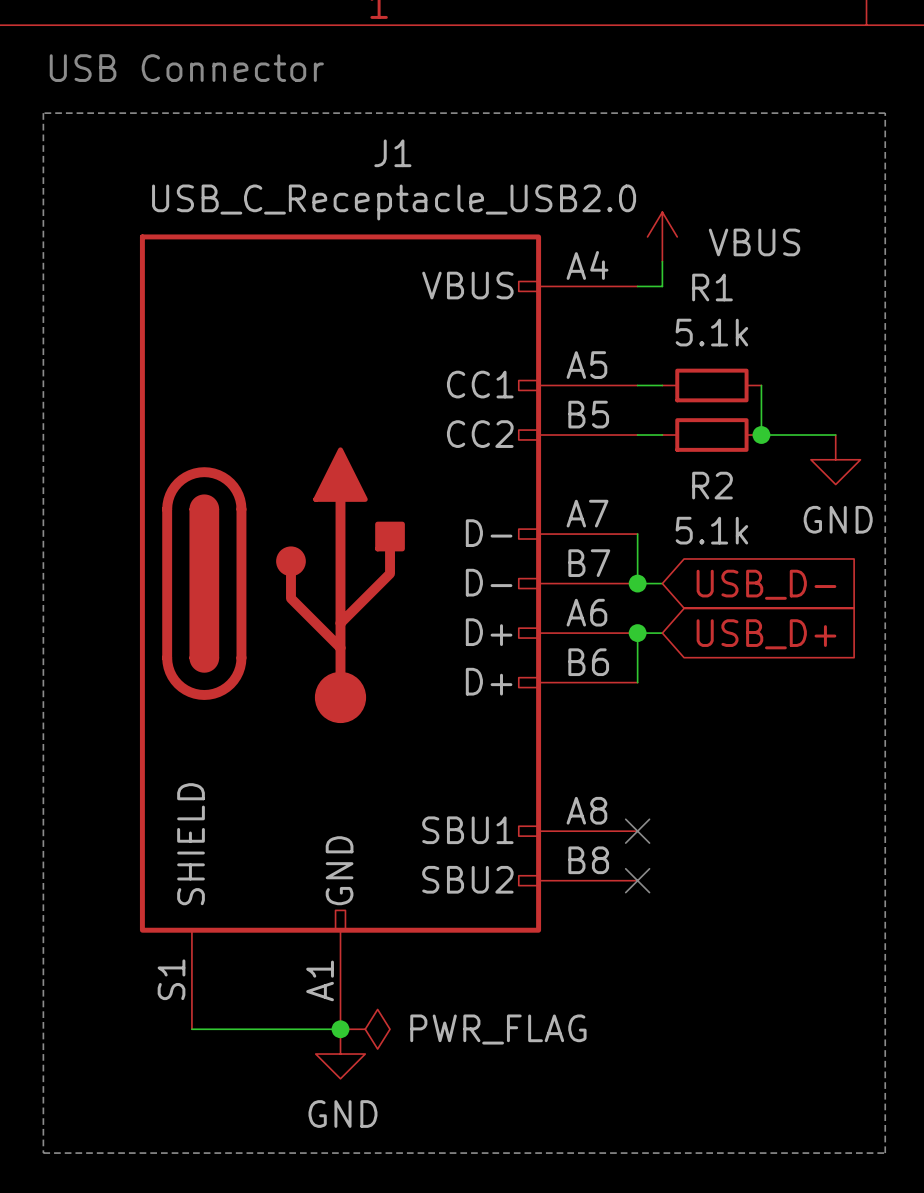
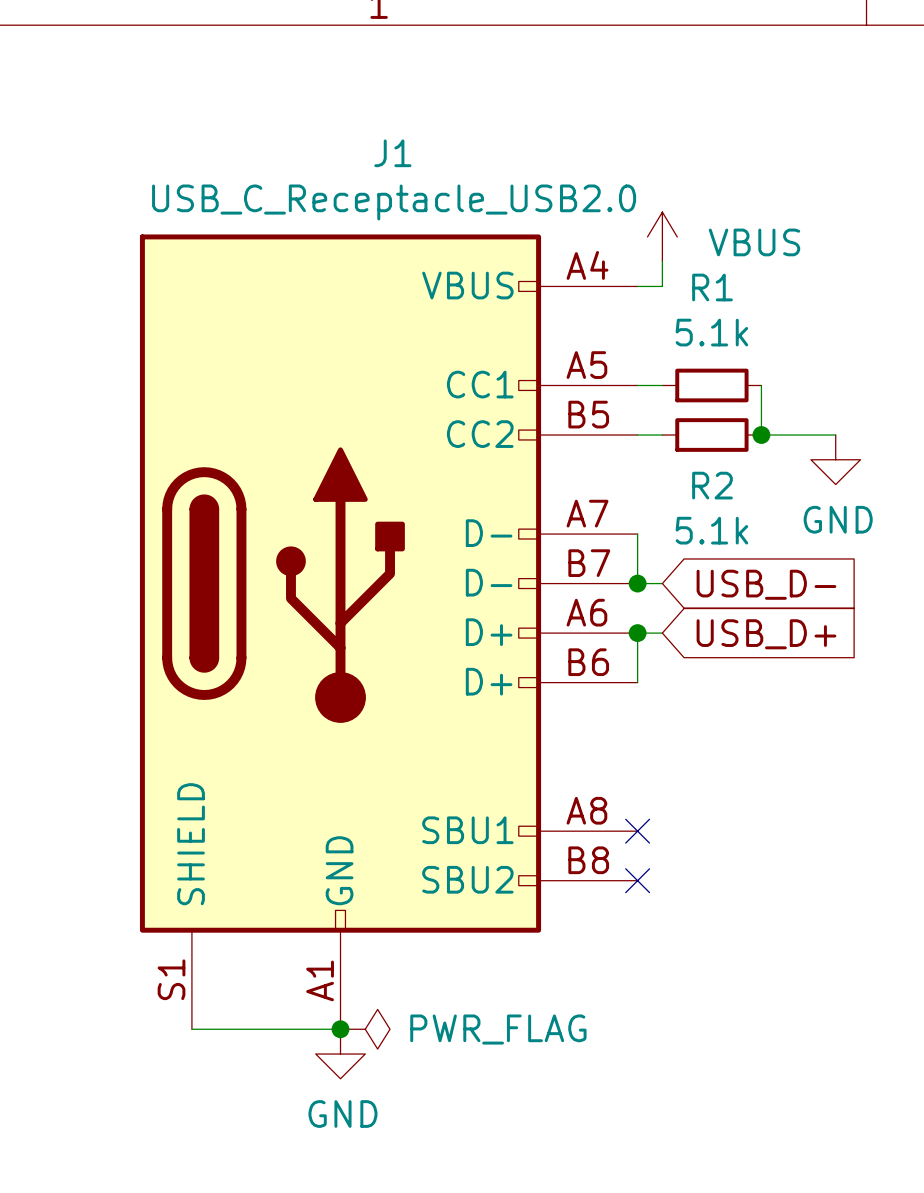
text: USB Connector (186, 68) -> none
line: (43, 113) (43, 1153) (885, 1153) (885, 113) (43, 113) -> none

